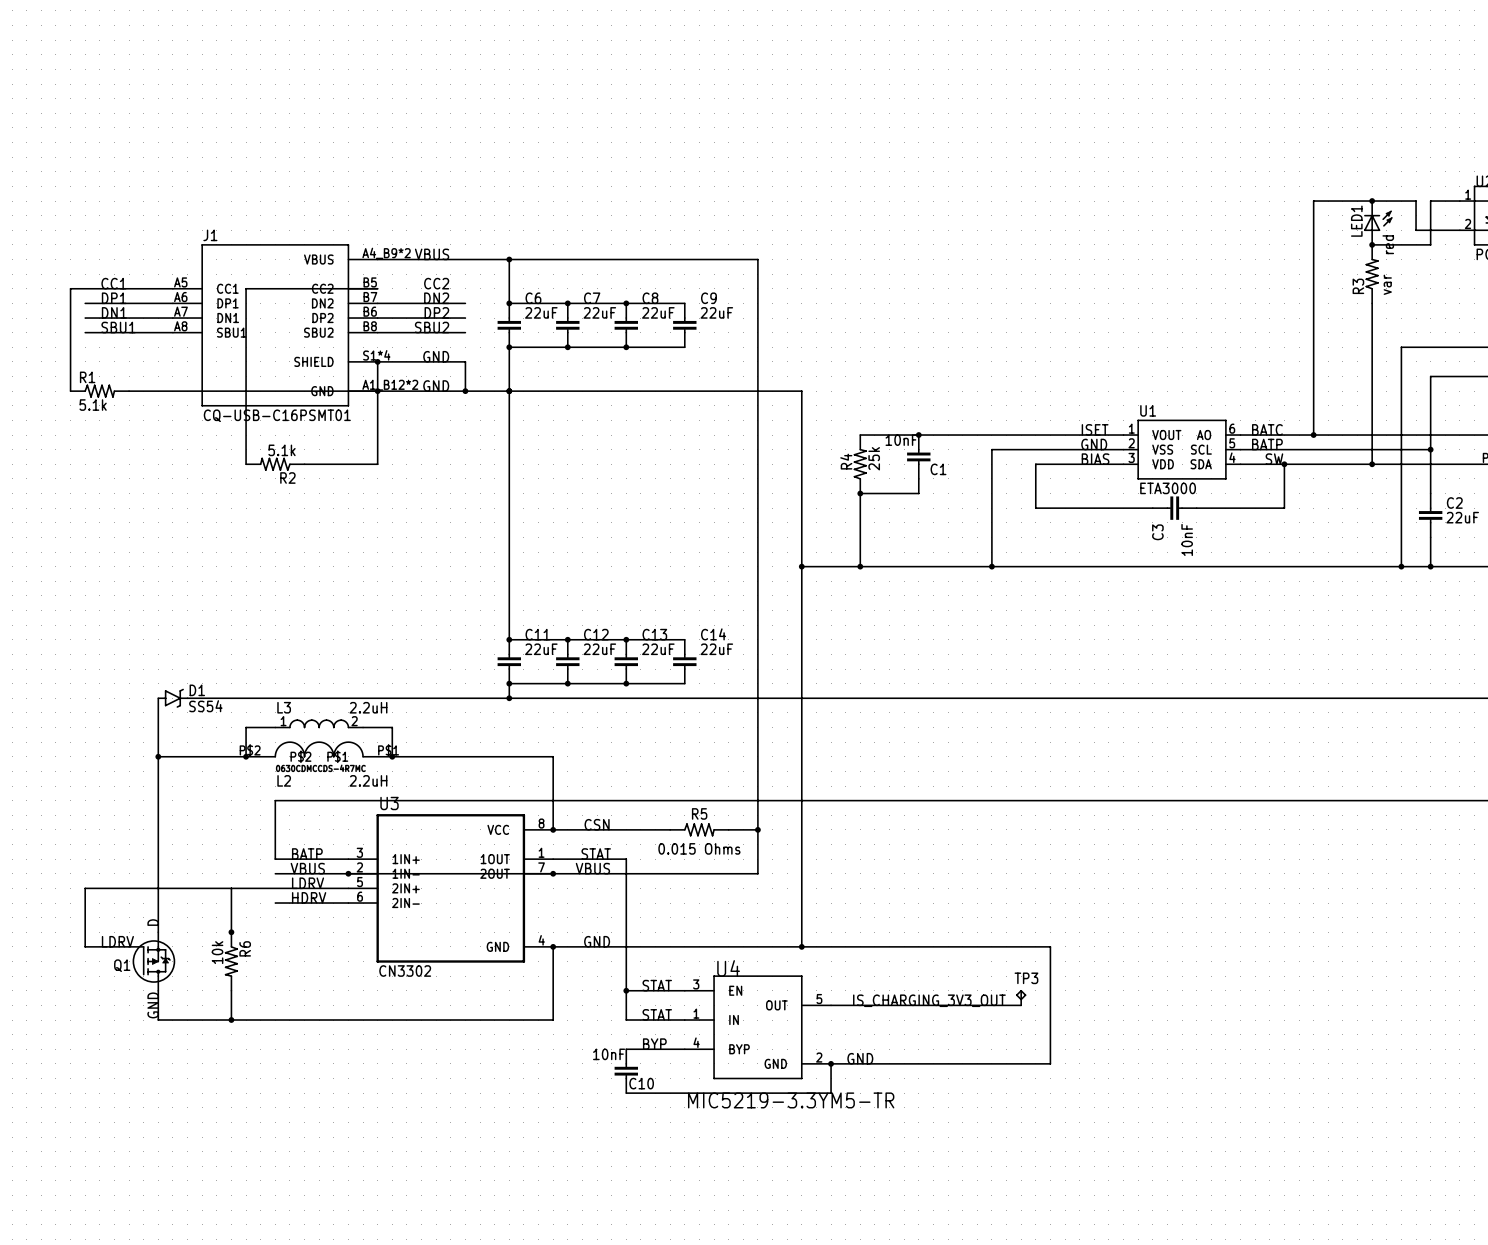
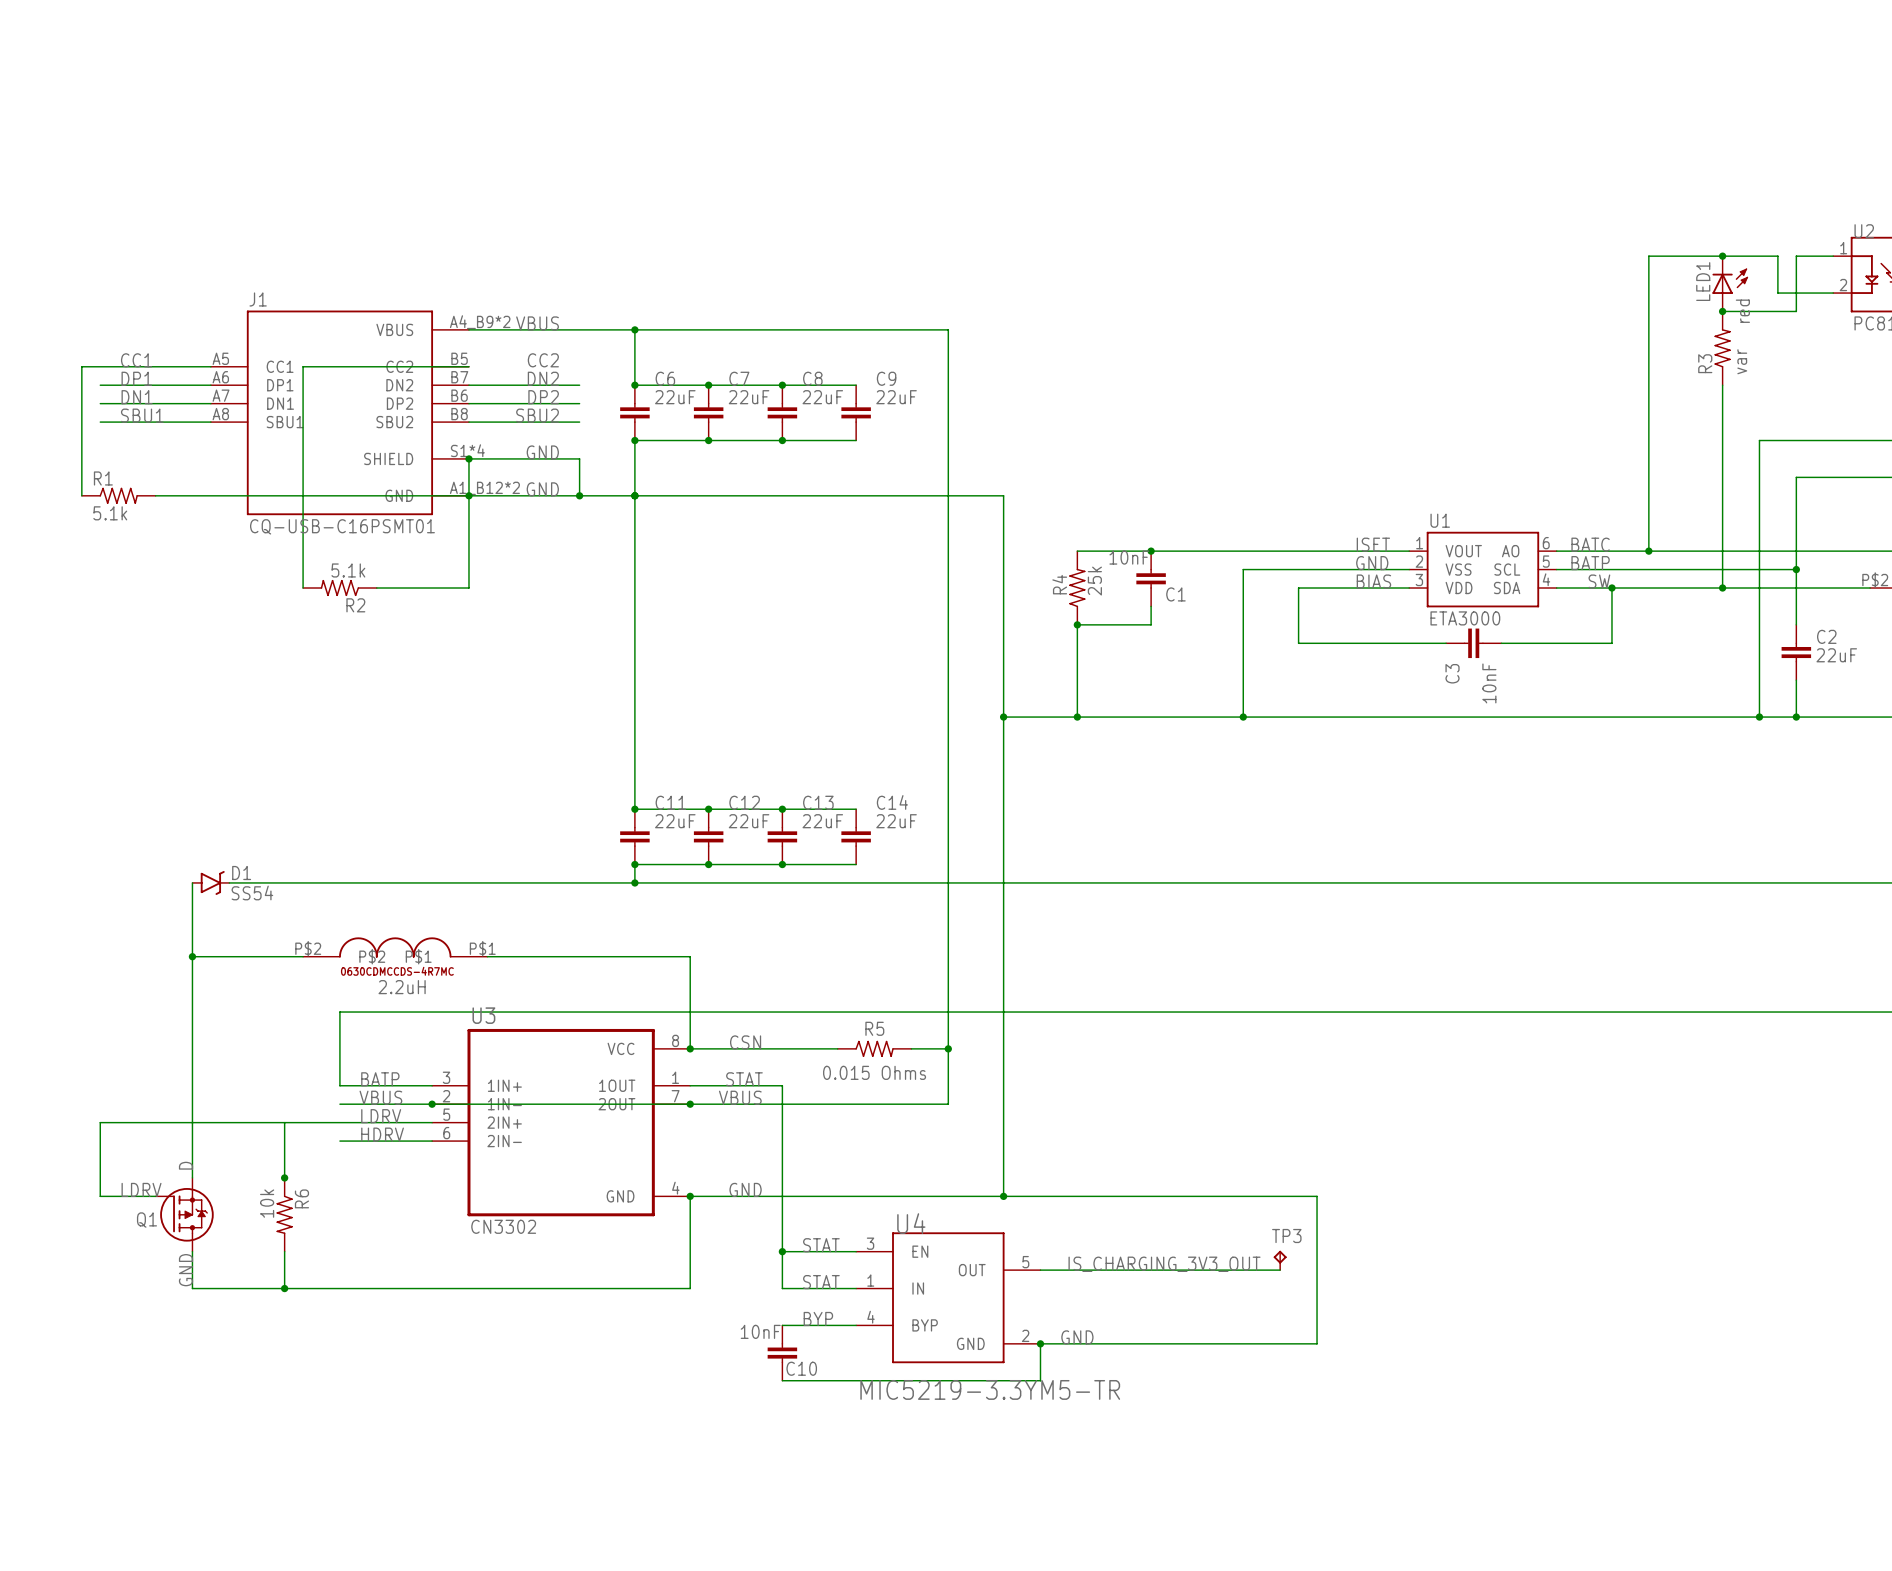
L3: 2.2uH (319, 723) -> none
wire: (275, 727) (246, 727) (246, 756) -> none
wire: (363, 727) (392, 727) (392, 756) -> none
junction: (246, 756) -> none
junction: (392, 756) -> none
text: L2 (284, 780) -> none
text position: 2.2uH (368, 780) -> 2.2uH (402, 987)

